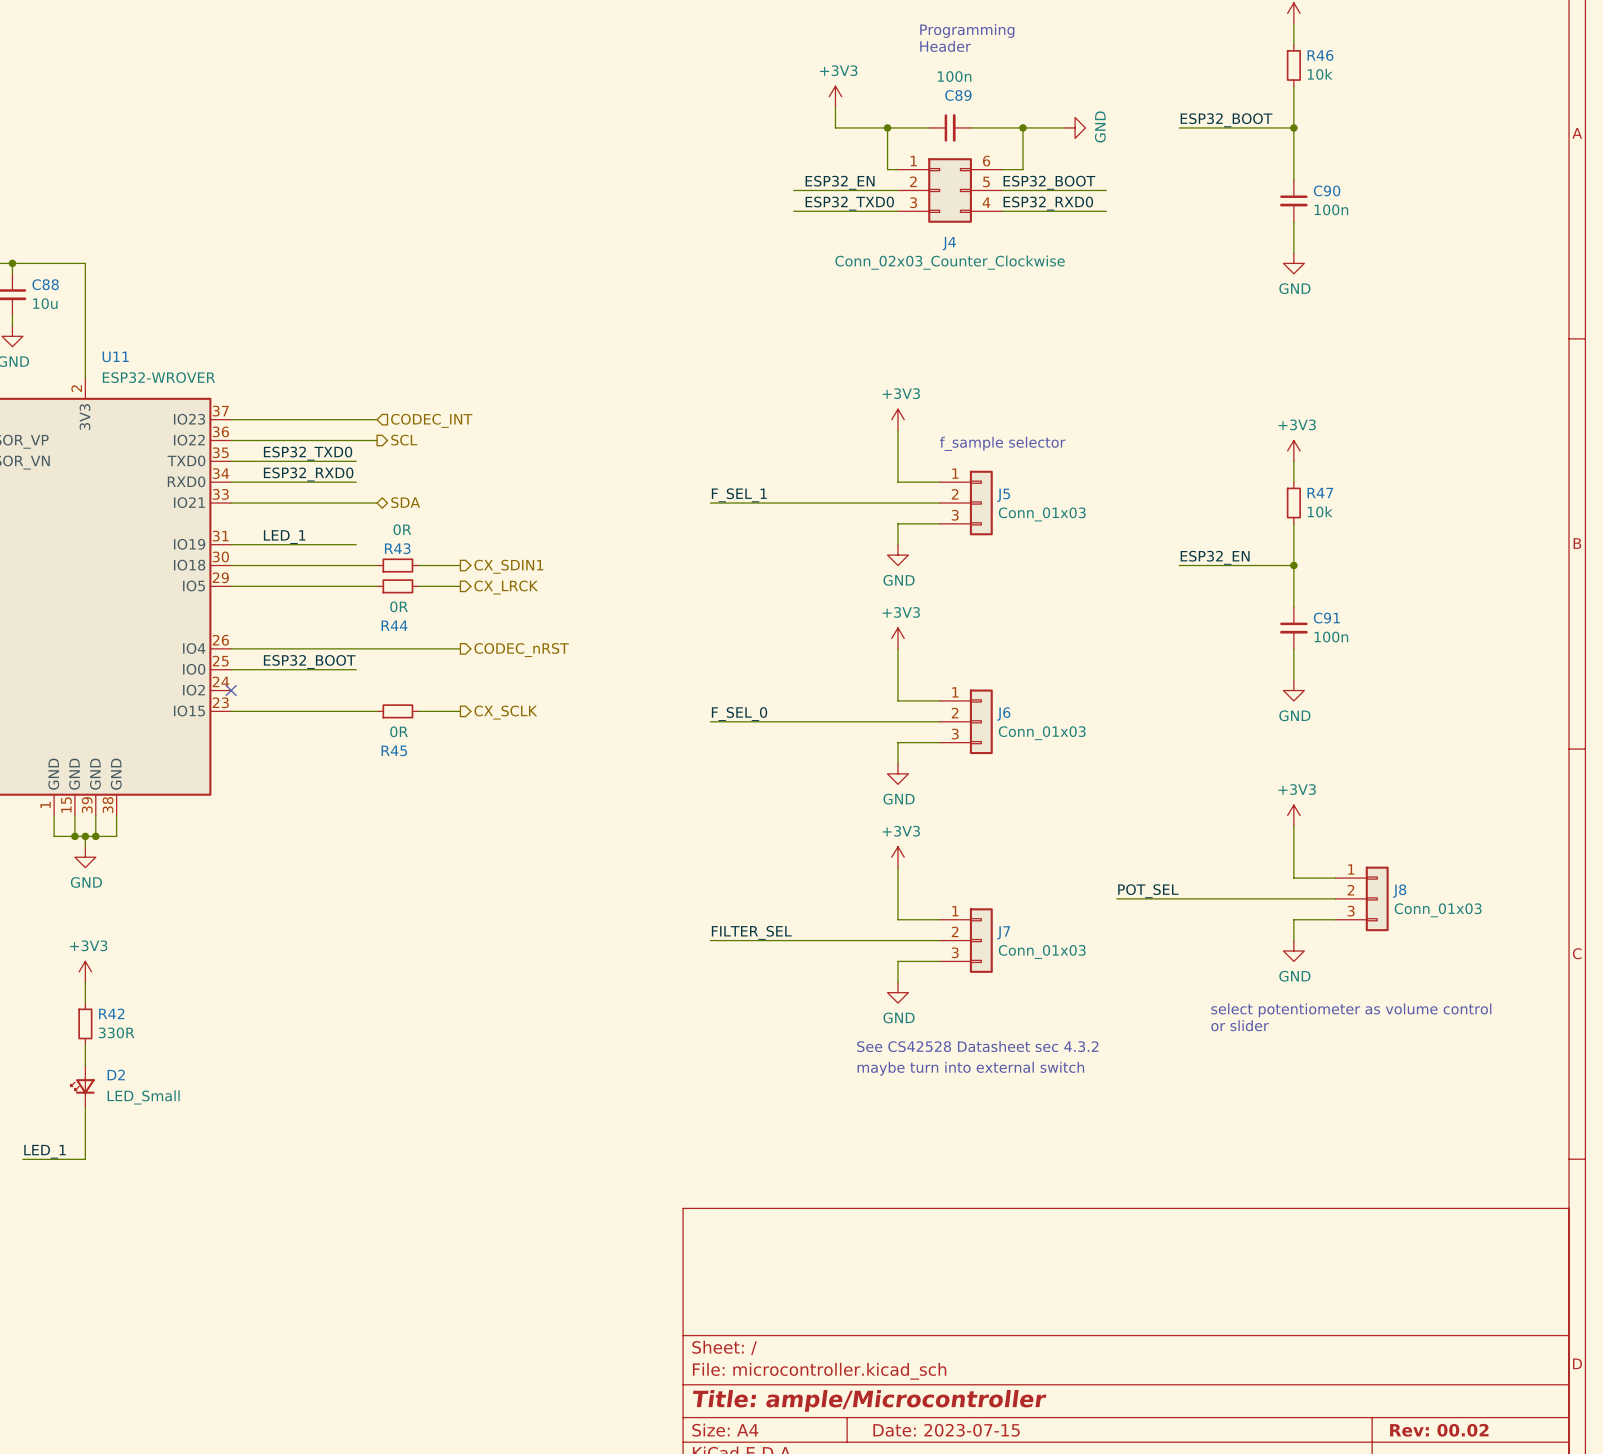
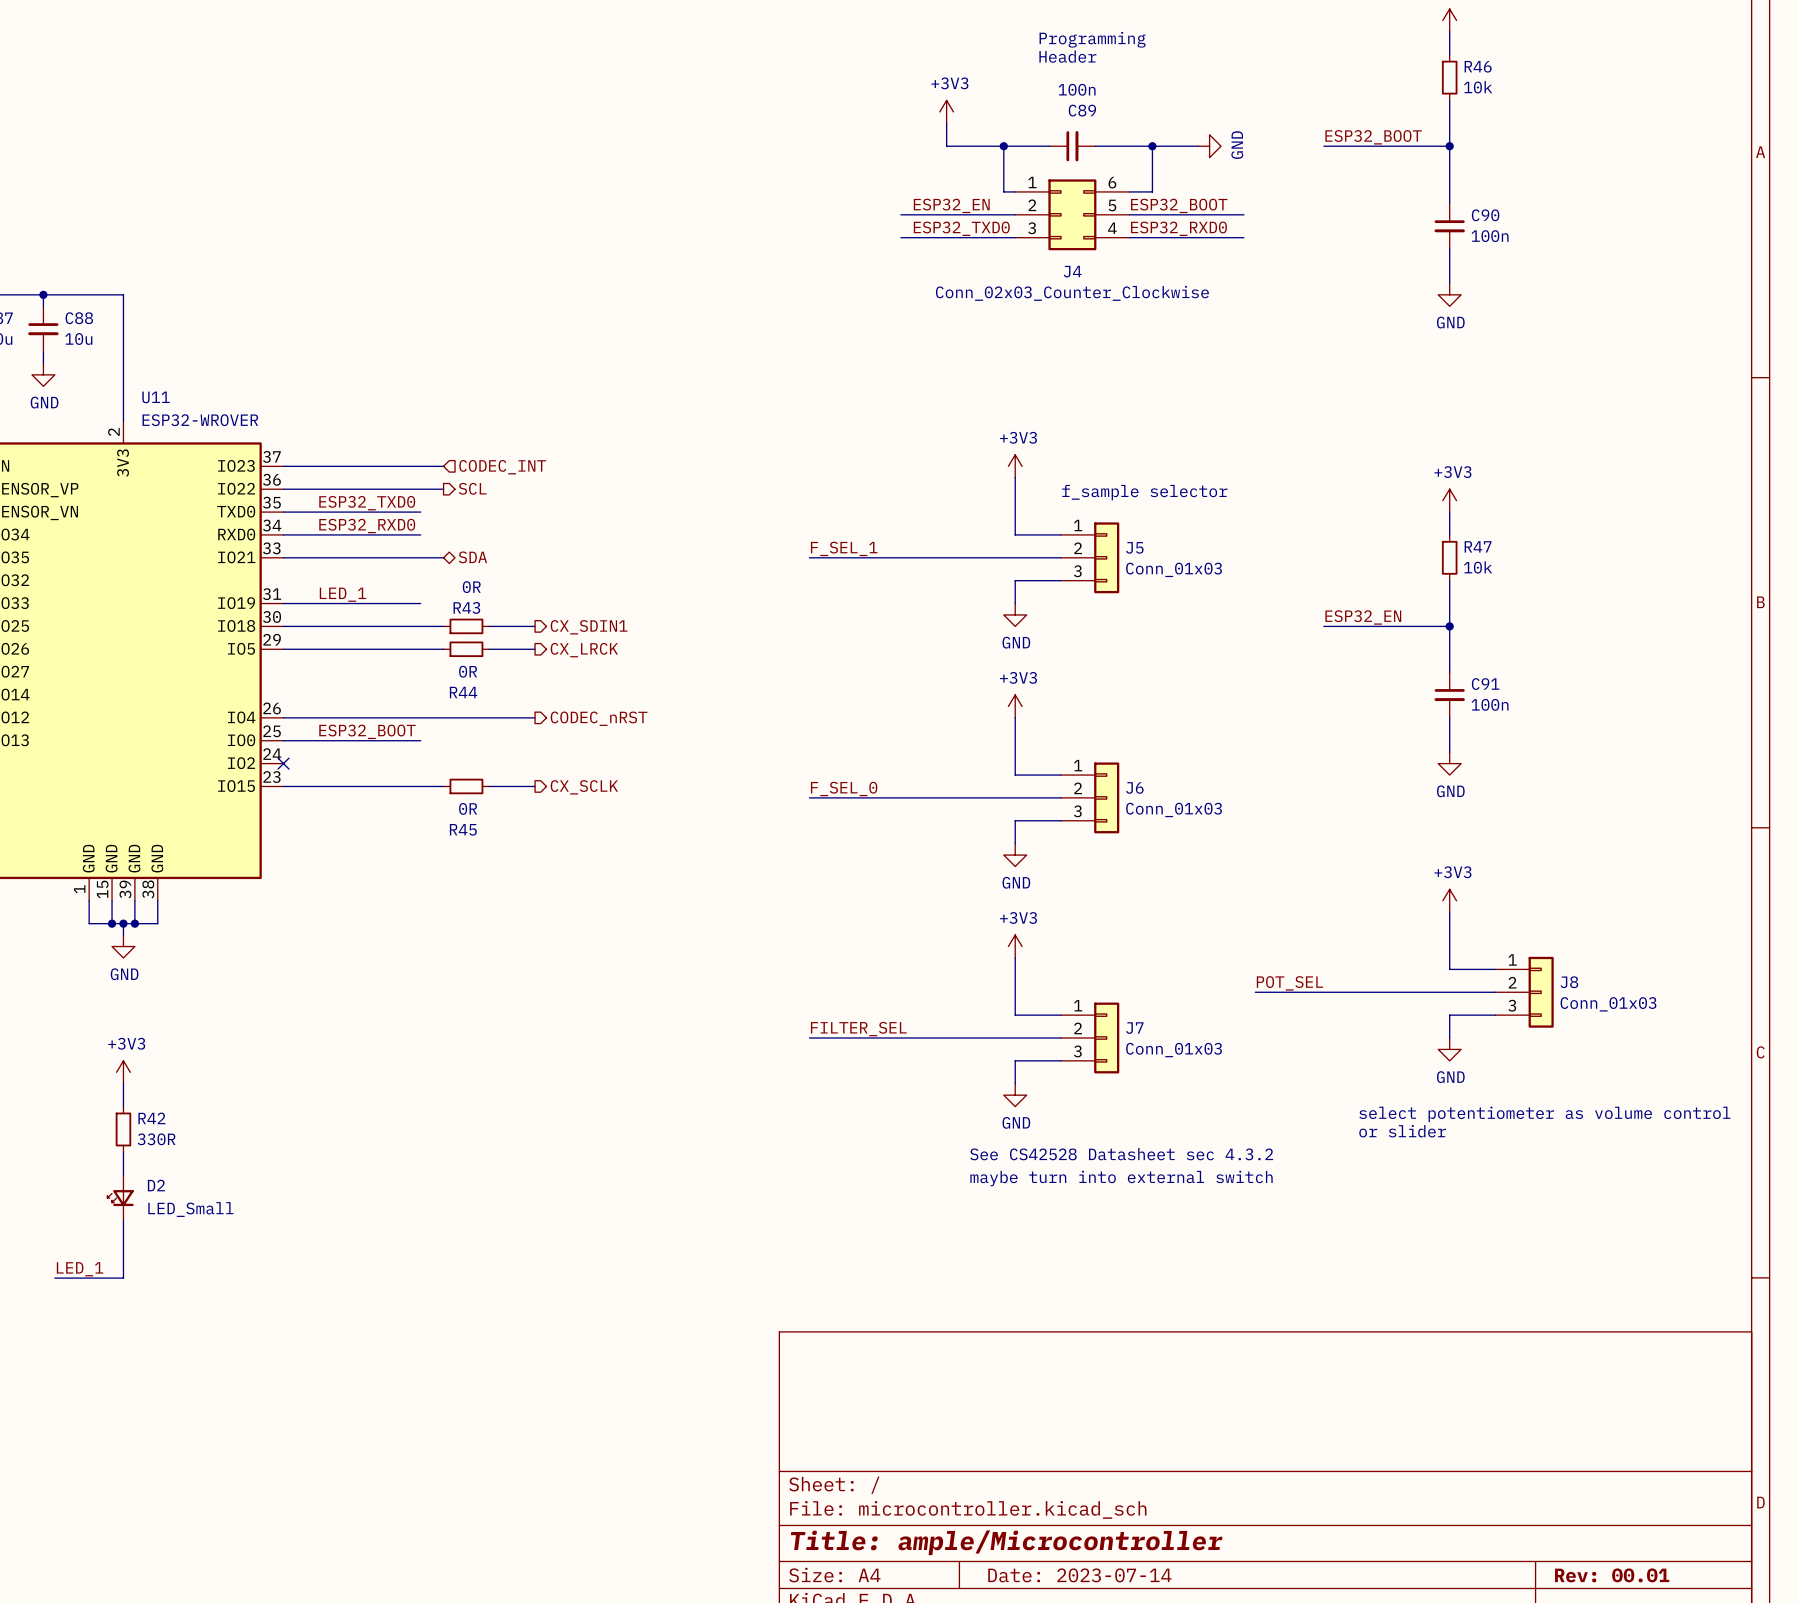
title block: Date: 2023-07-15 (946, 1430) -> Date: 2023-07-14 (1079, 1575)
title block: Rev: 00.02 (1439, 1430) -> Rev: 00.01 (1612, 1575)

